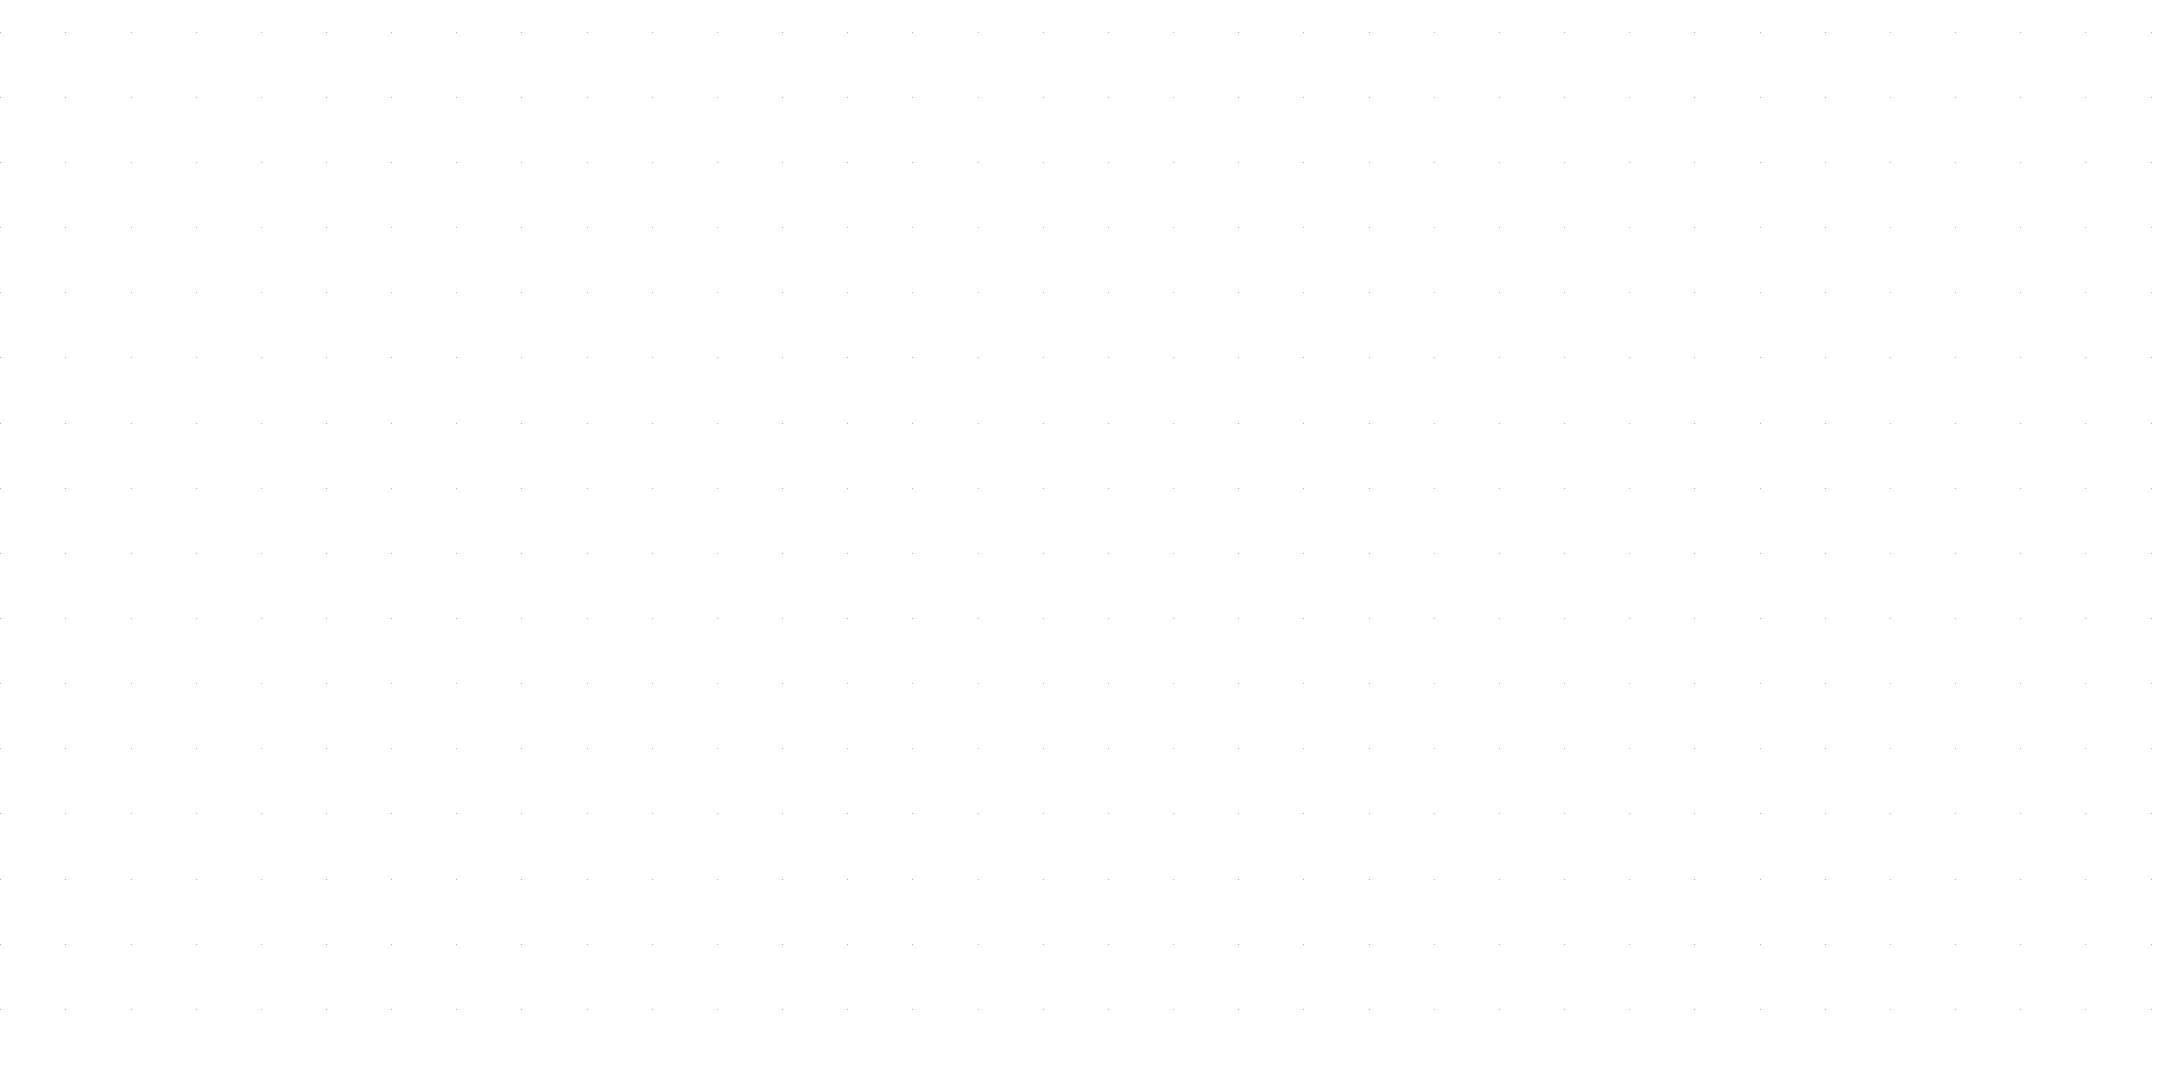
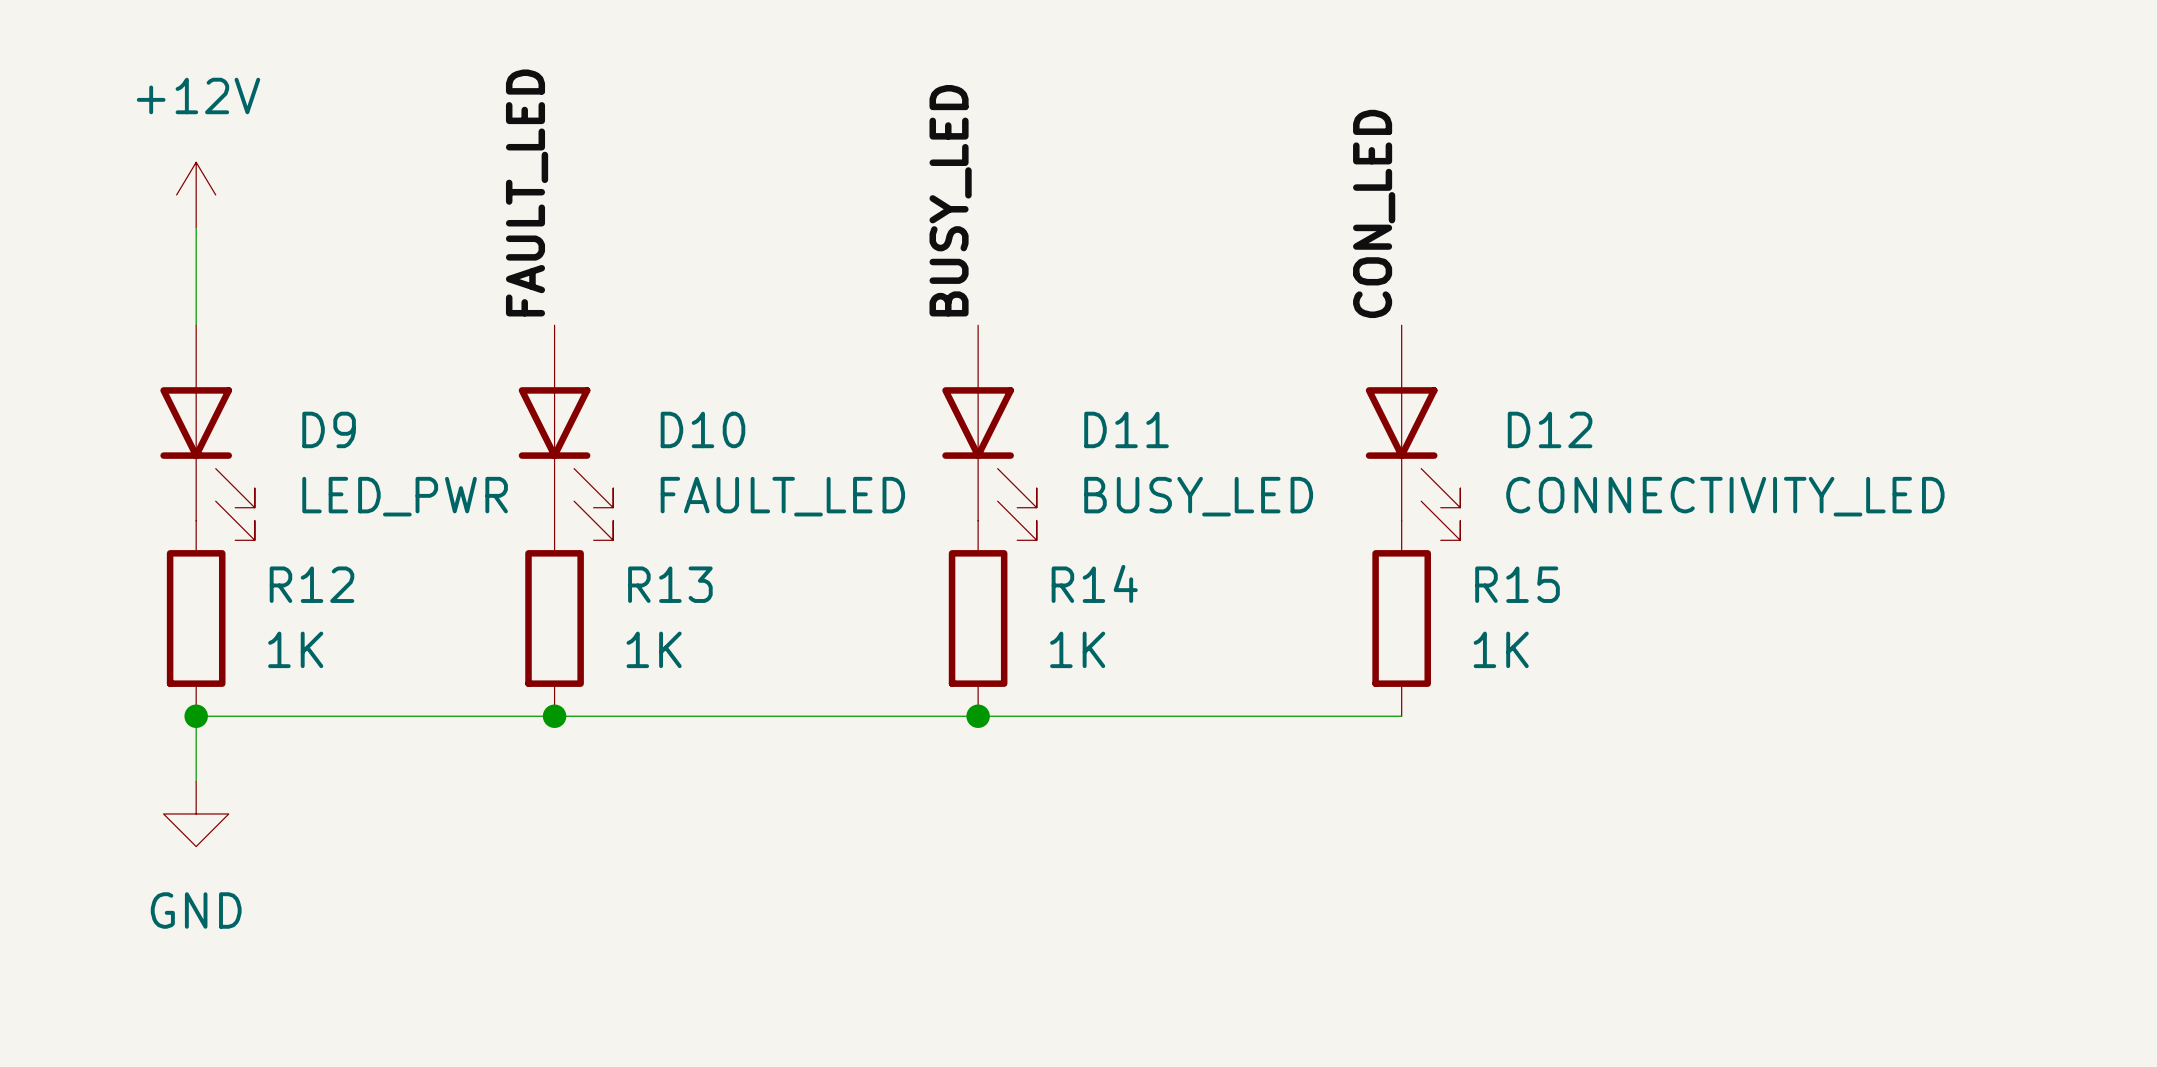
label: none -> FAULT_LED (527, 192)
power symbol: none -> +12V (196, 194)
label: none -> BUSY_LED (950, 200)
label: none -> CON_LED (1374, 213)
wire: none -> (196, 227) (196, 325)
D9: none -> LED_PWR (207, 432)
D10: none -> FAULT_LED (565, 432)
D11: none -> BUSY_LED (989, 432)
D12: none -> CONNECTIVITY_LED (1413, 432)
R12: none -> 1K (196, 618)
R13: none -> 1K (554, 618)
R14: none -> 1K (978, 618)
R15: none -> 1K (1401, 618)
junction: none -> (196, 716)
junction: none -> (554, 716)
junction: none -> (978, 716)
wire: none -> (1401, 716) (196, 716) (196, 781)
power symbol: none -> GND (196, 813)

